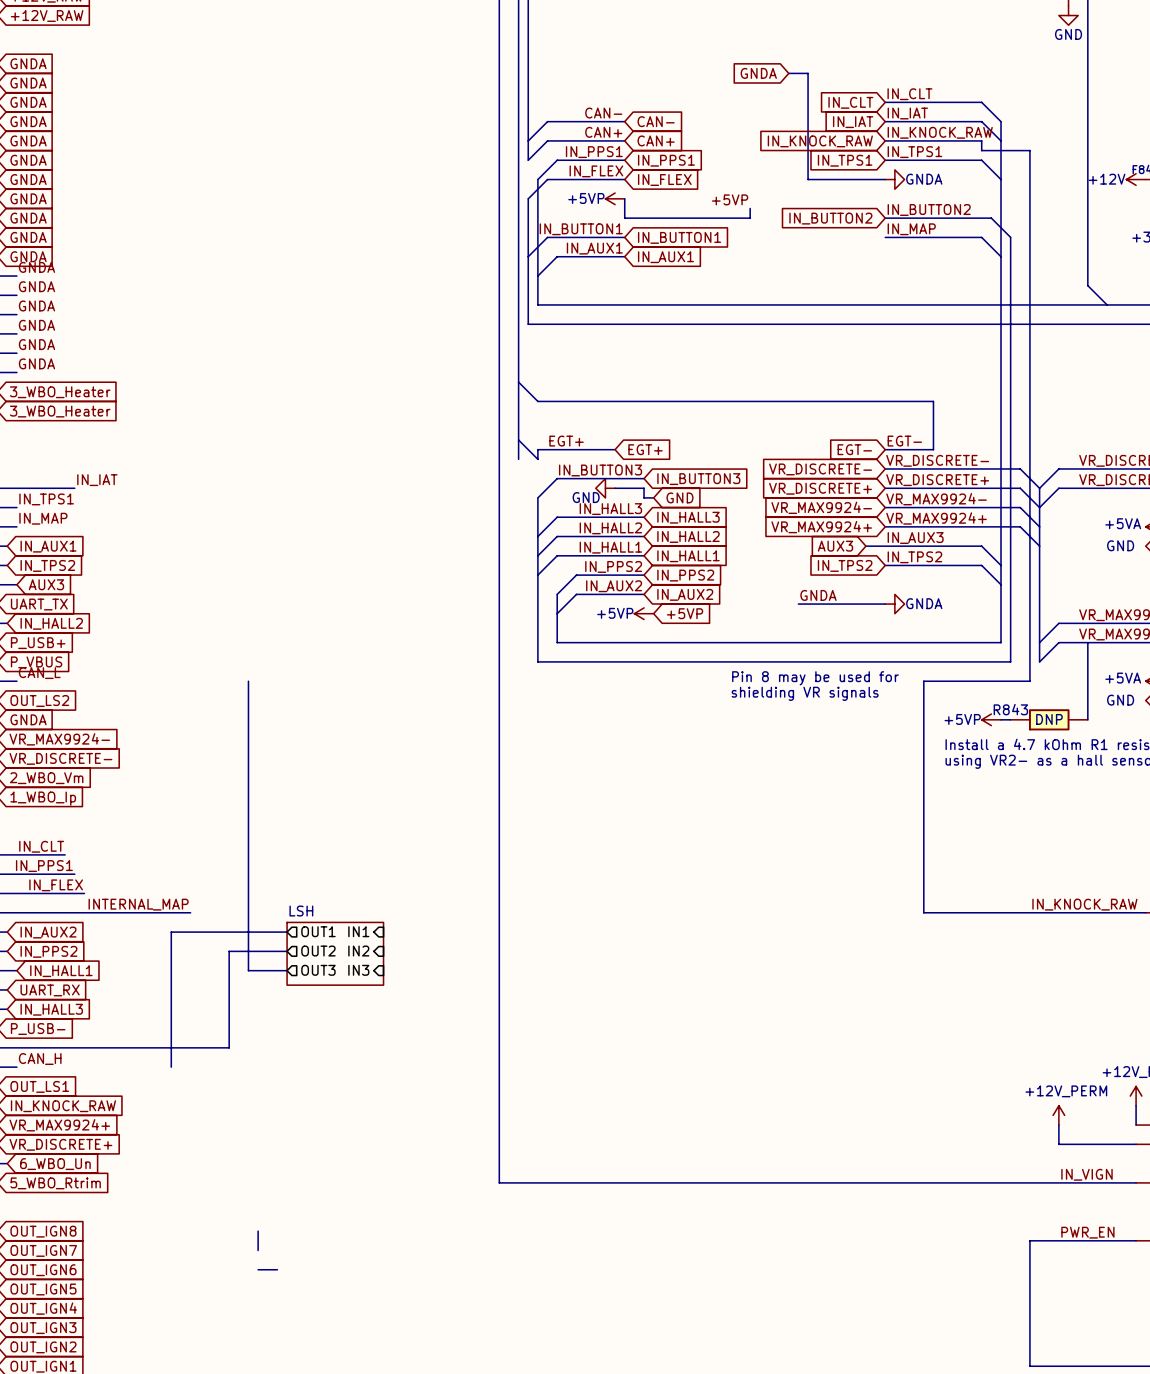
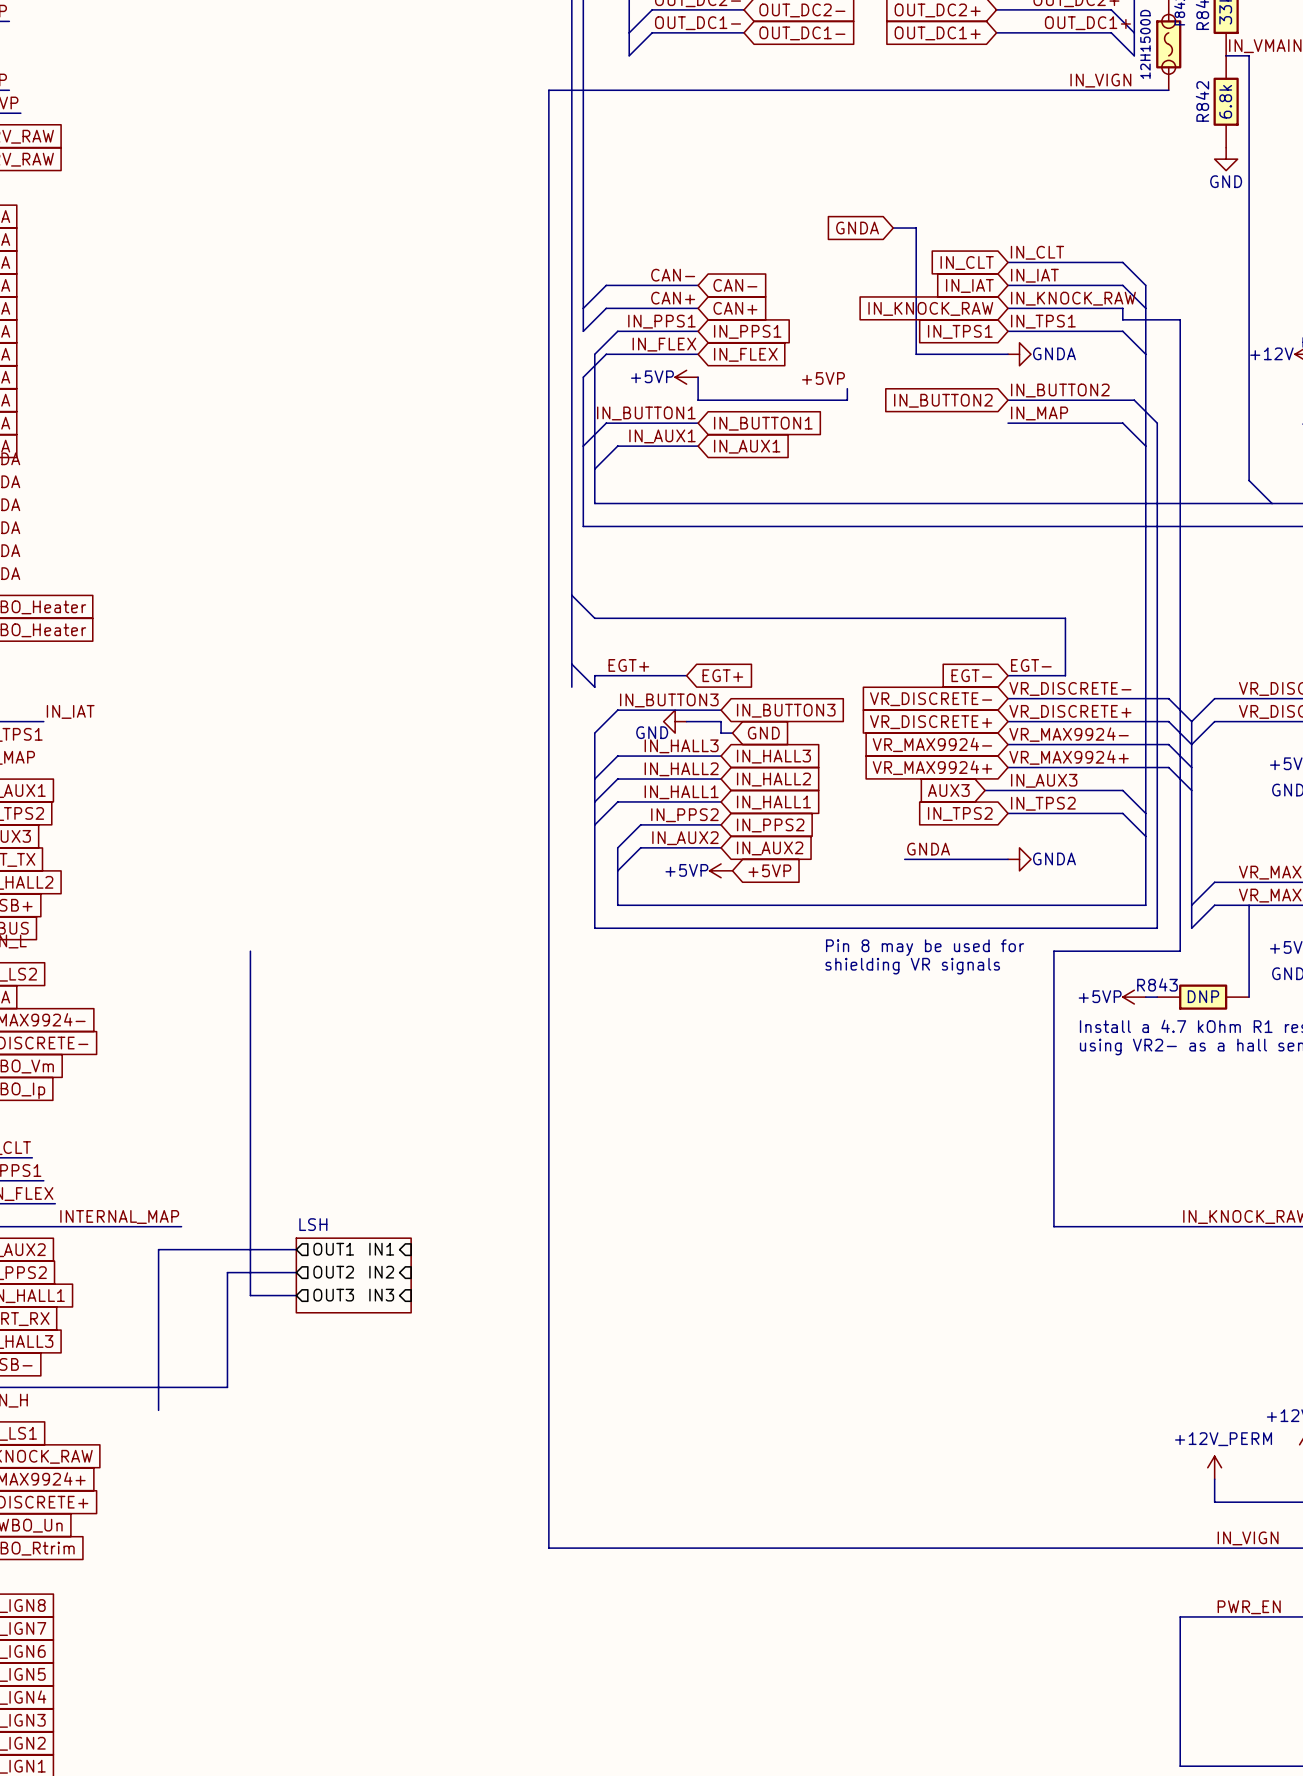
wire: (258, 1231) (258, 1250) -> none
wire: (258, 1269) (277, 1269) -> none

